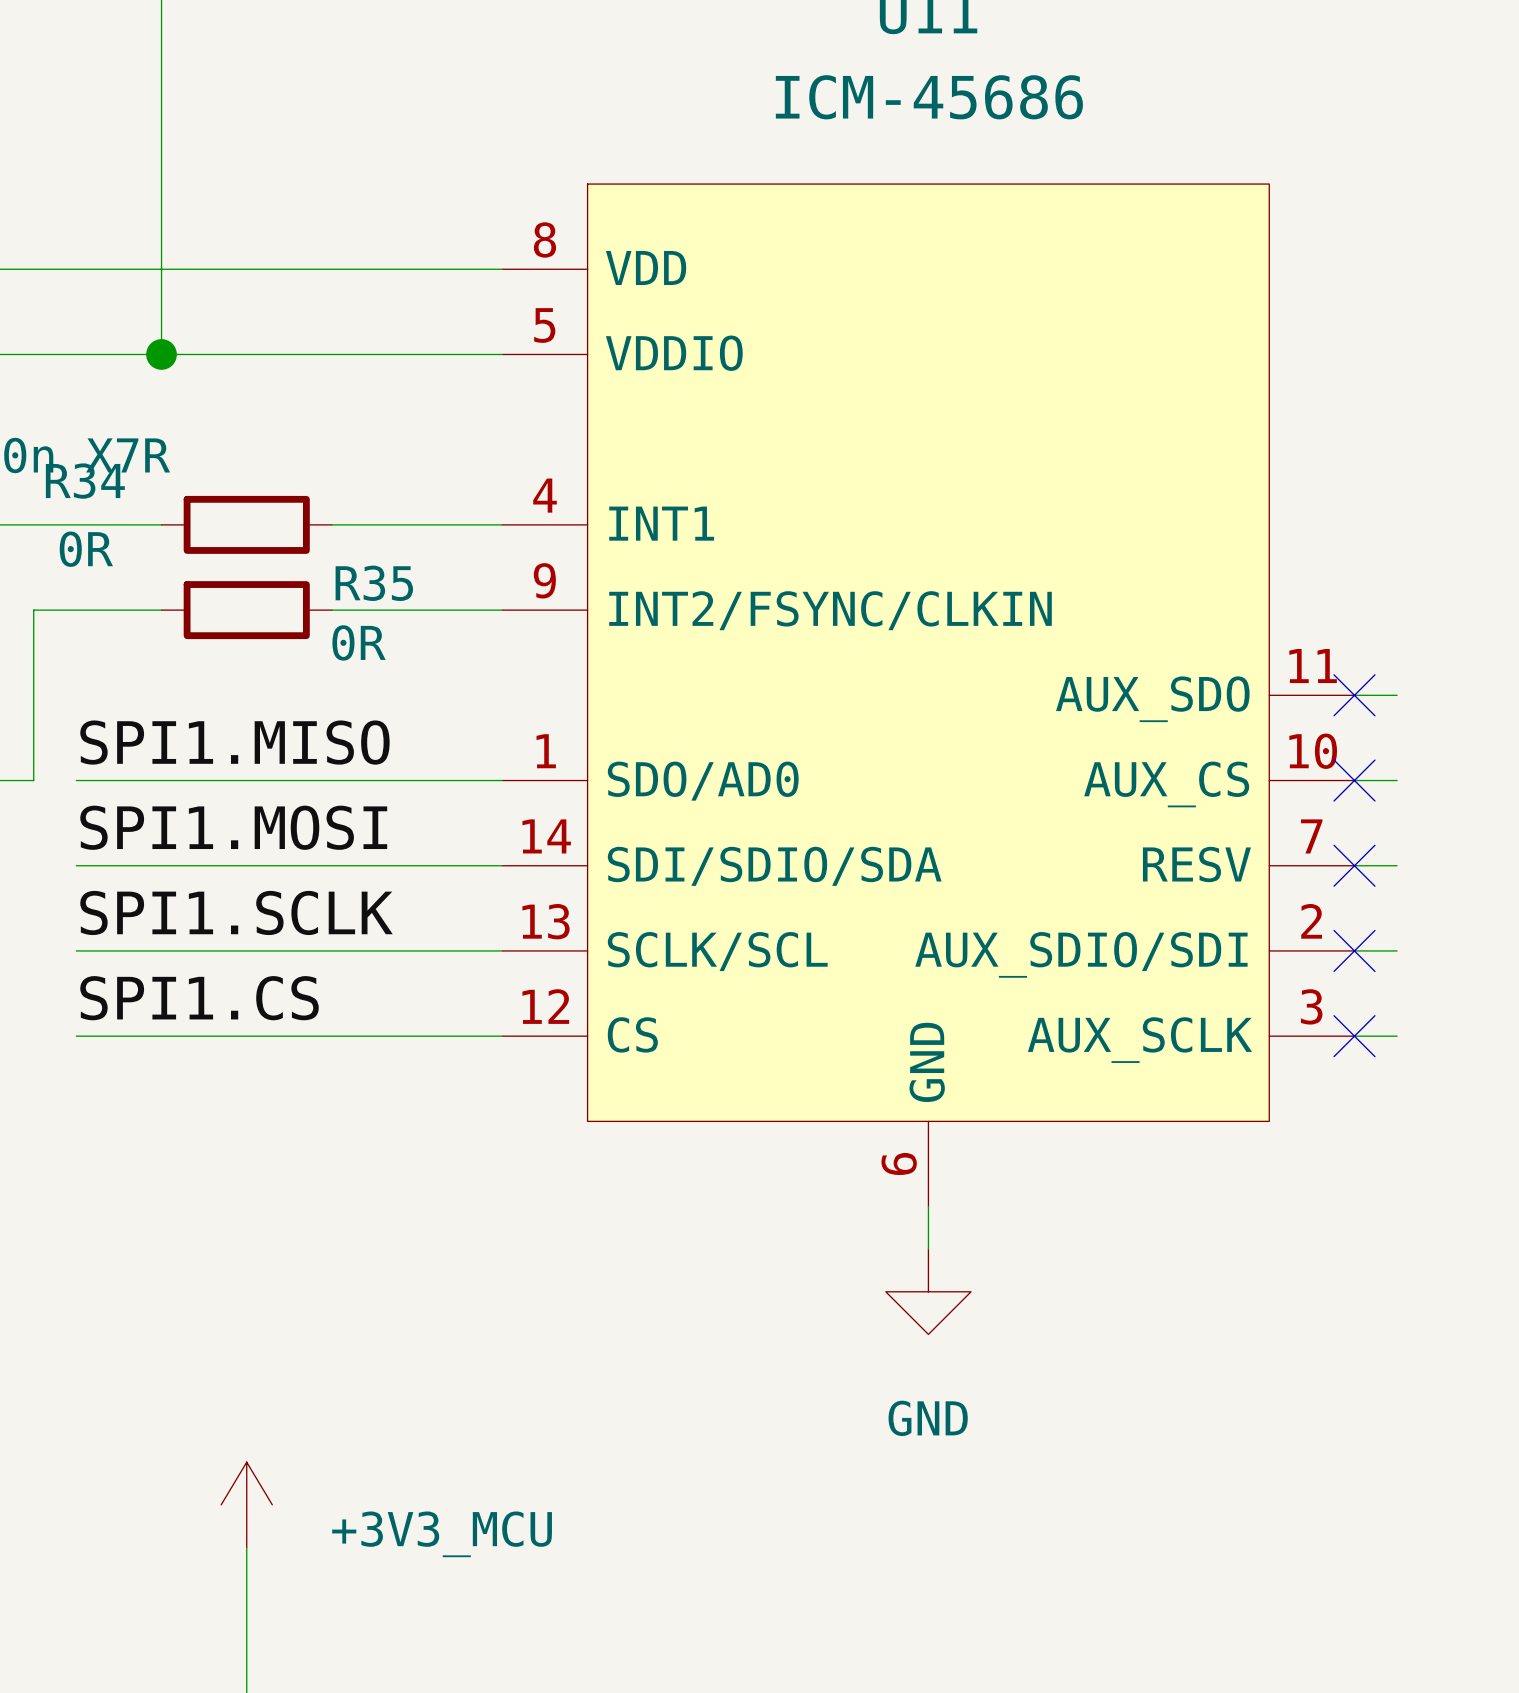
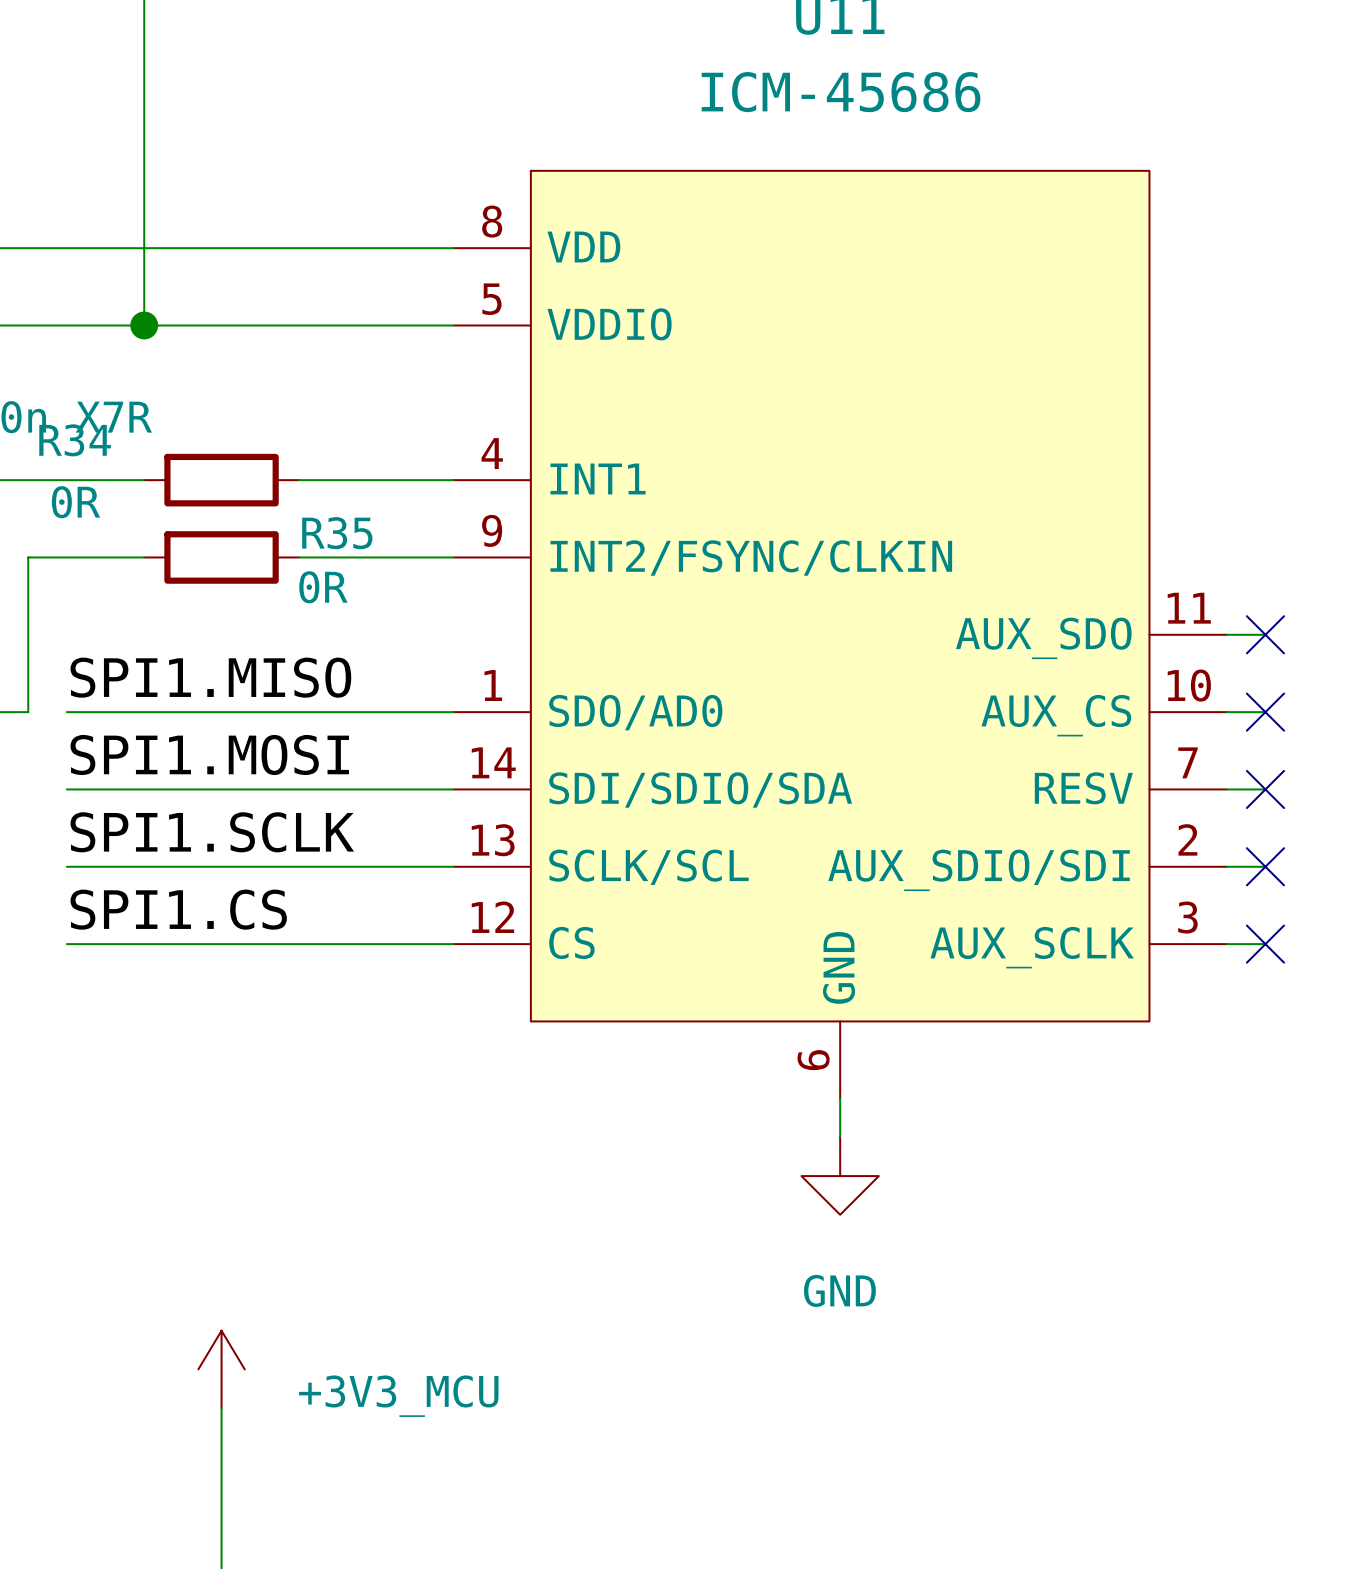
no-connect mark position: (1354, 695) -> (1265, 634)
no-connect mark position: (1354, 780) -> (1265, 712)
no-connect mark position: (1354, 865) -> (1265, 789)
no-connect mark position: (1354, 950) -> (1265, 866)
no-connect mark position: (1354, 1036) -> (1265, 944)

